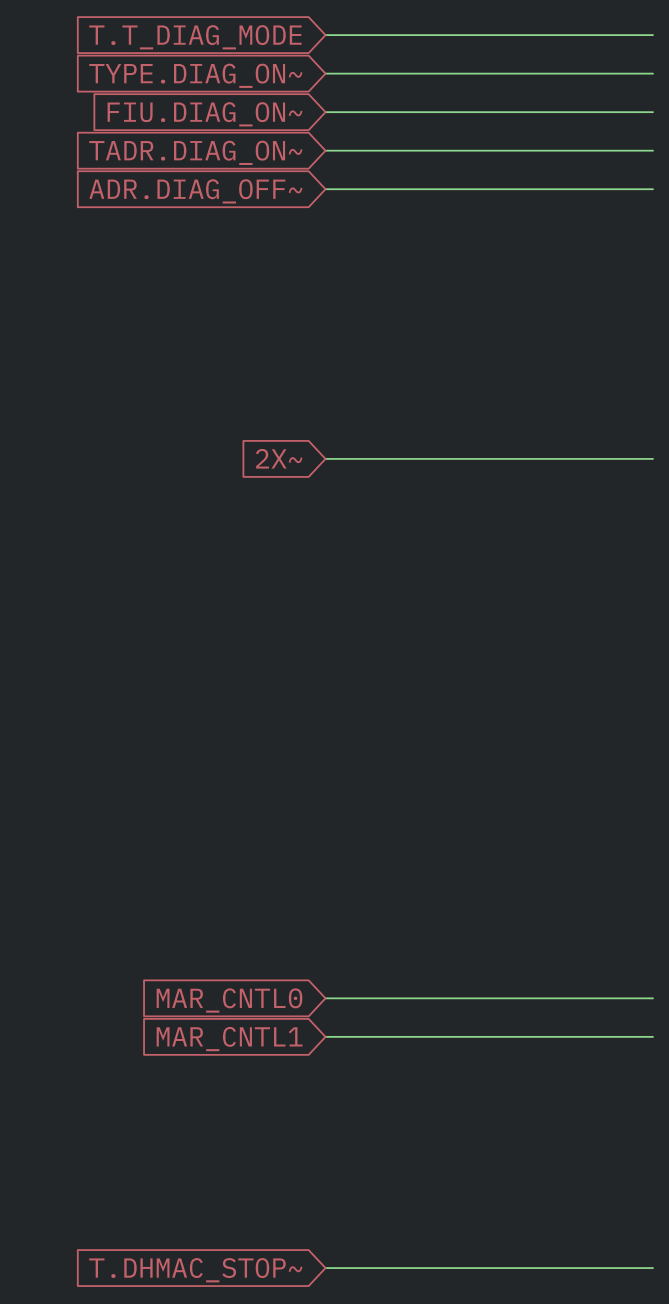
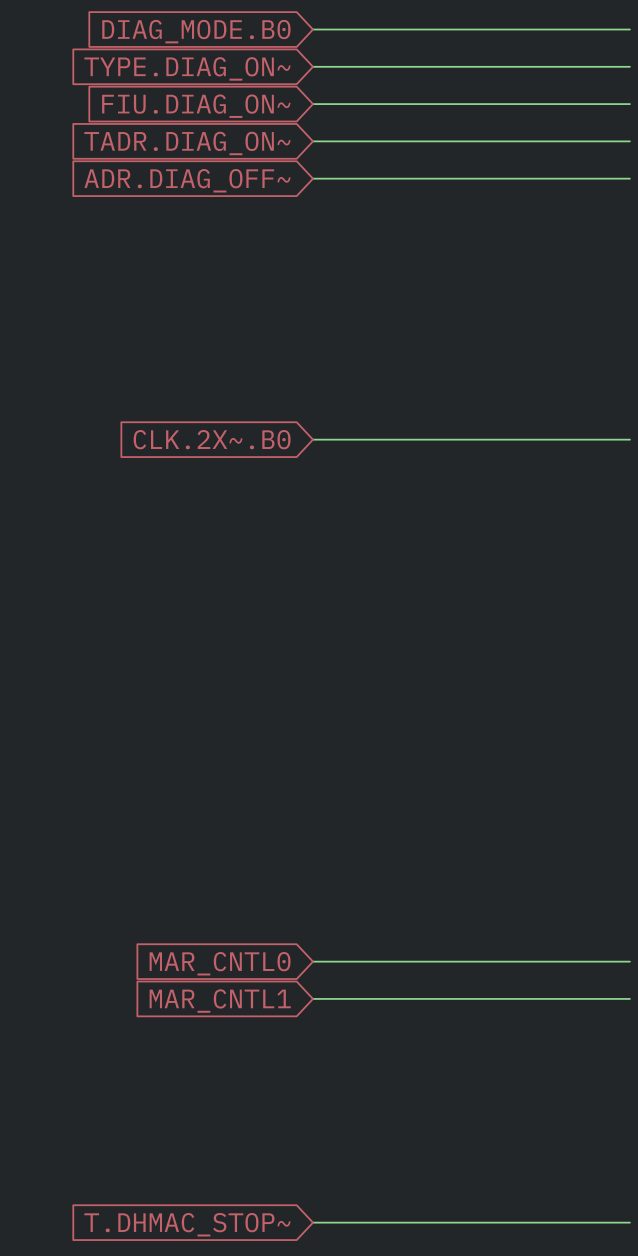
global label: T.T_DIAG_MODE (195, 37) -> DIAG_MODE.B0 (196, 31)
global label: 2X~ (279, 458) -> CLK.2X~.B0 (212, 439)

